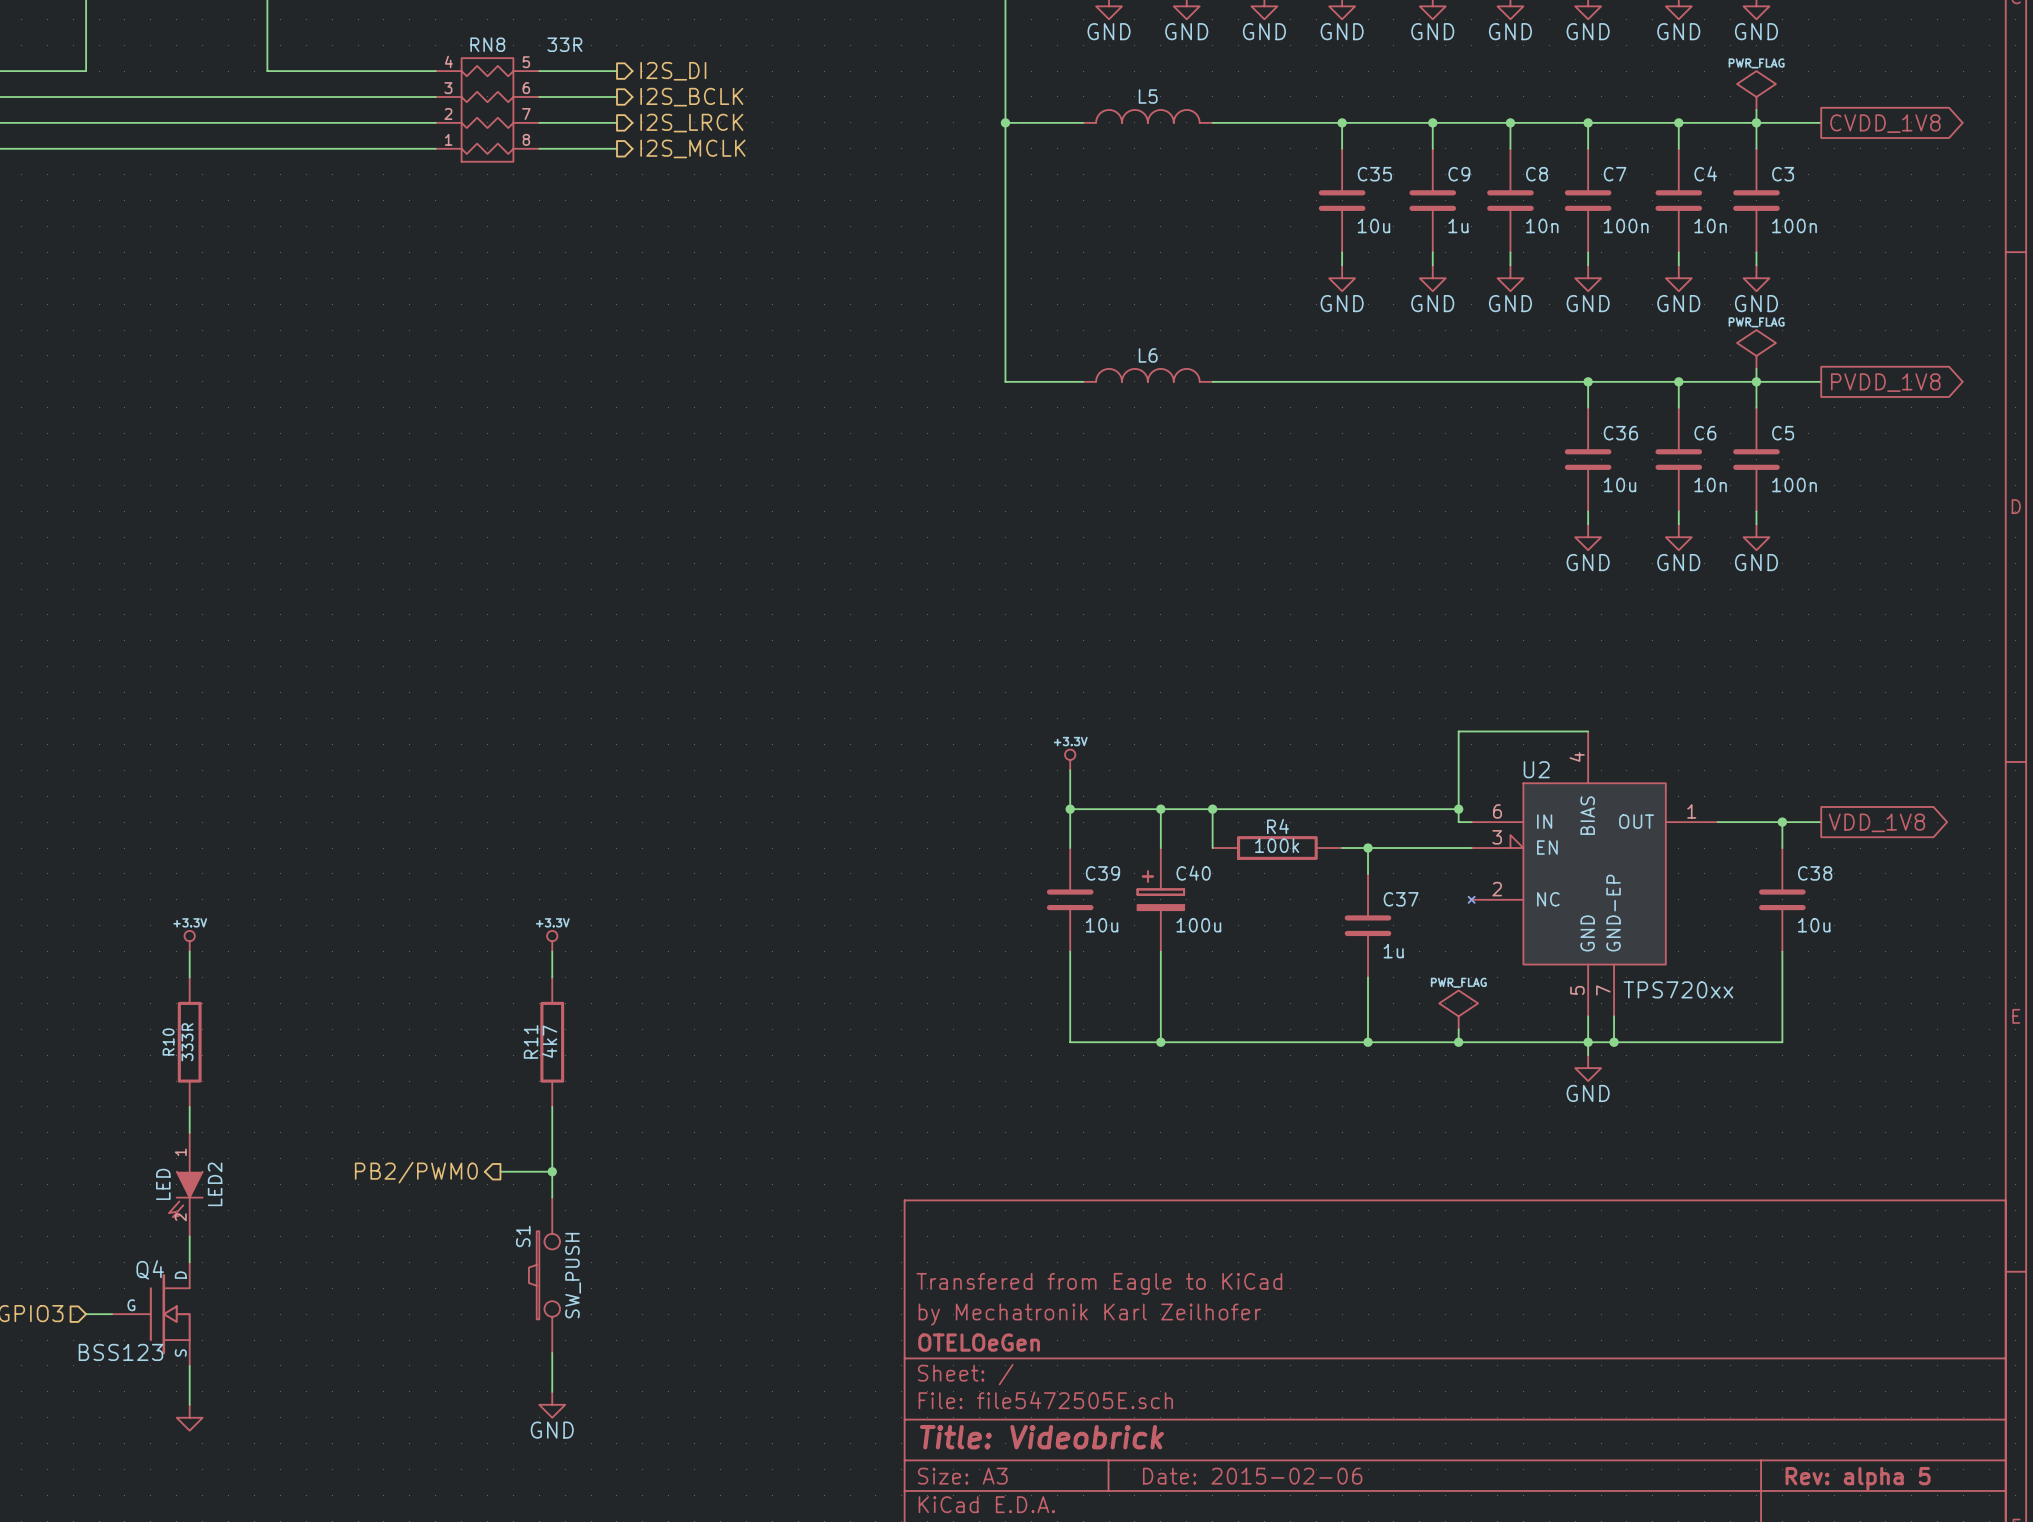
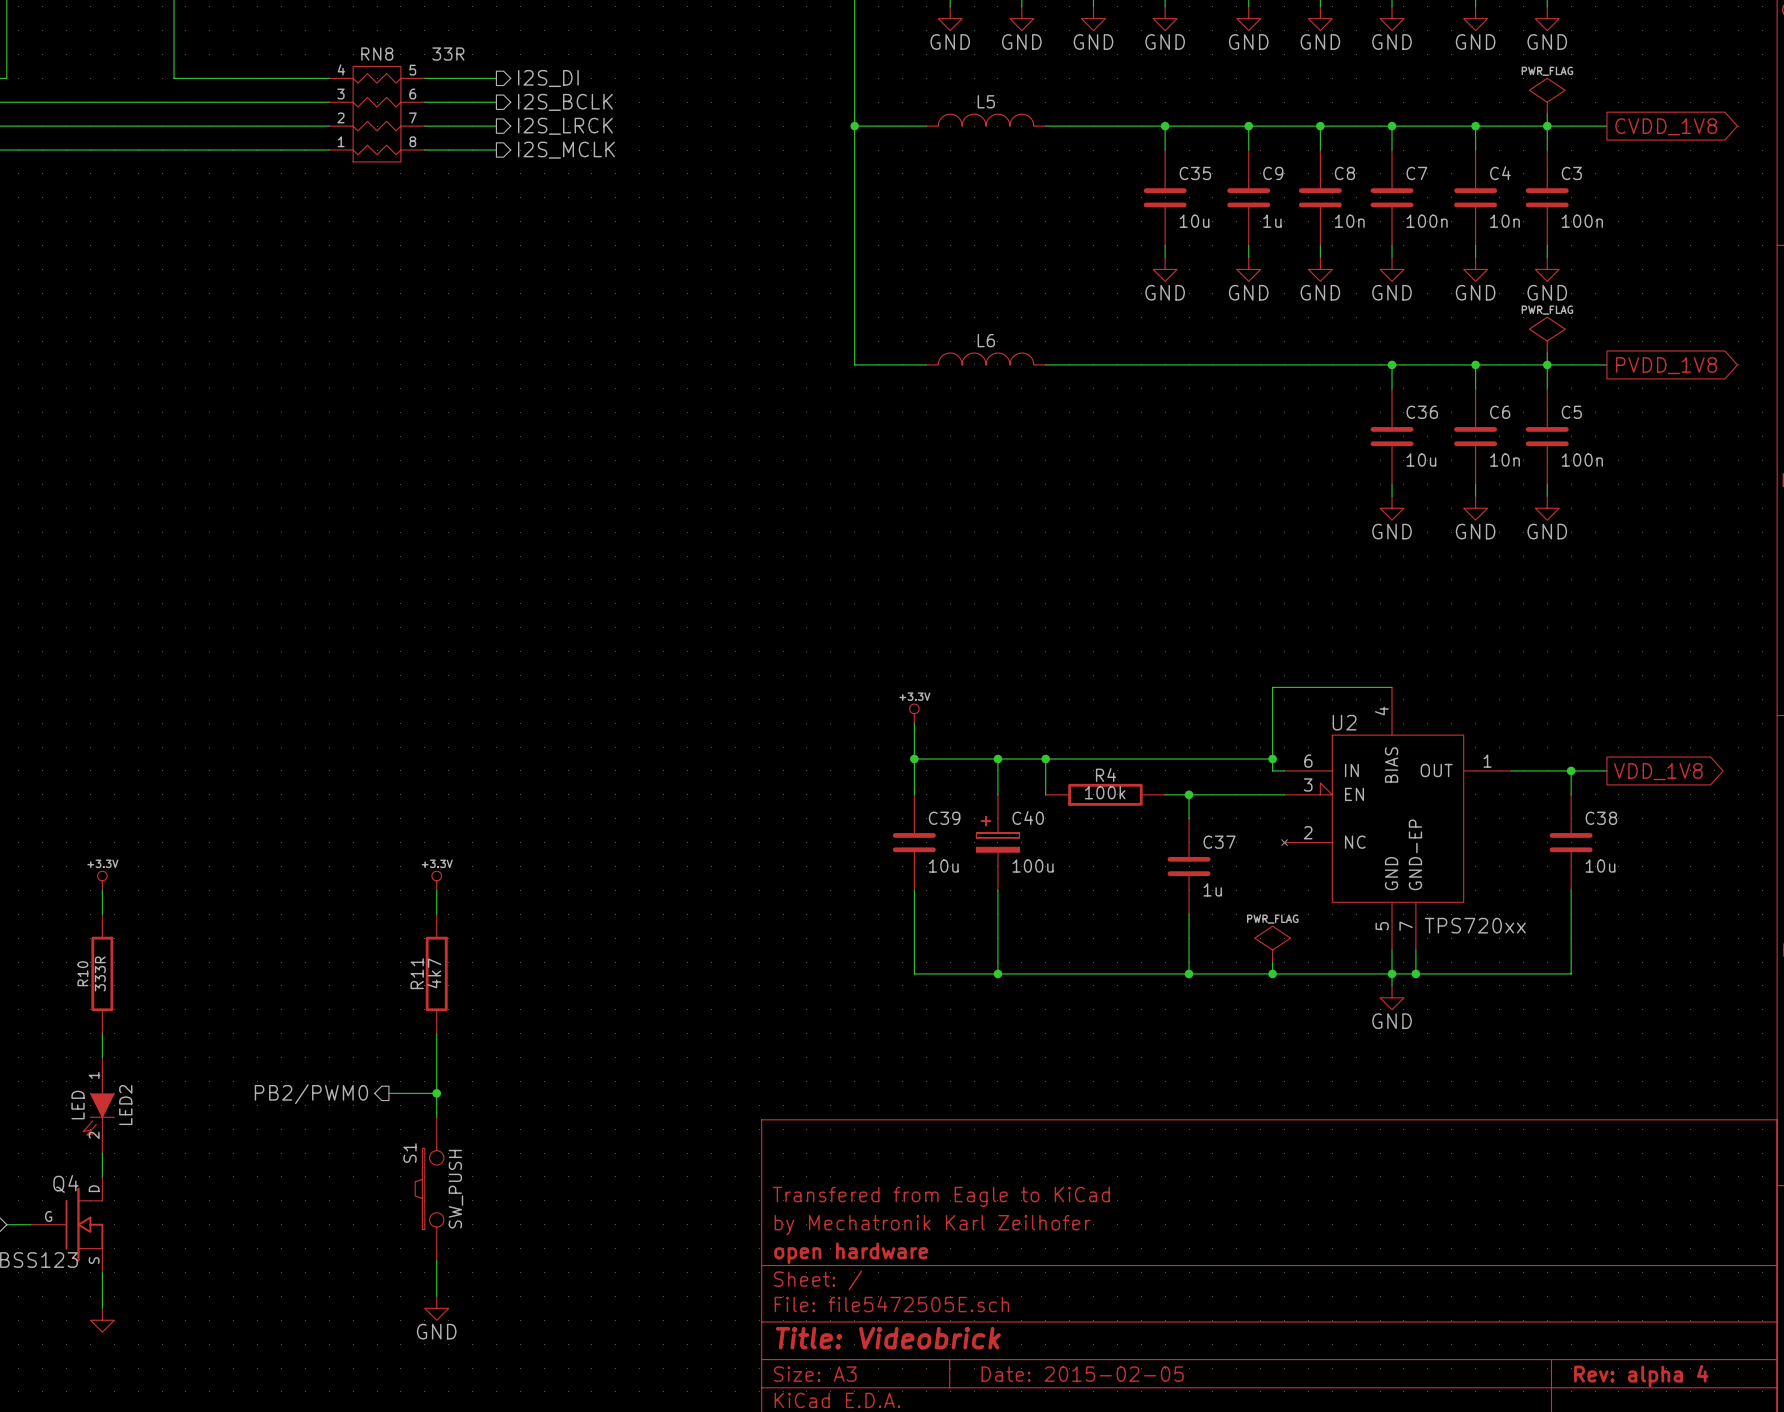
title block: OTELOeGen (979, 1342) -> open hardware (851, 1253)
title block: Date: 2015-02-06 (1252, 1476) -> Date: 2015-02-05 (1082, 1374)
title block: Rev: alpha 5 (1858, 1478) -> Rev: alpha 4 (1641, 1376)

